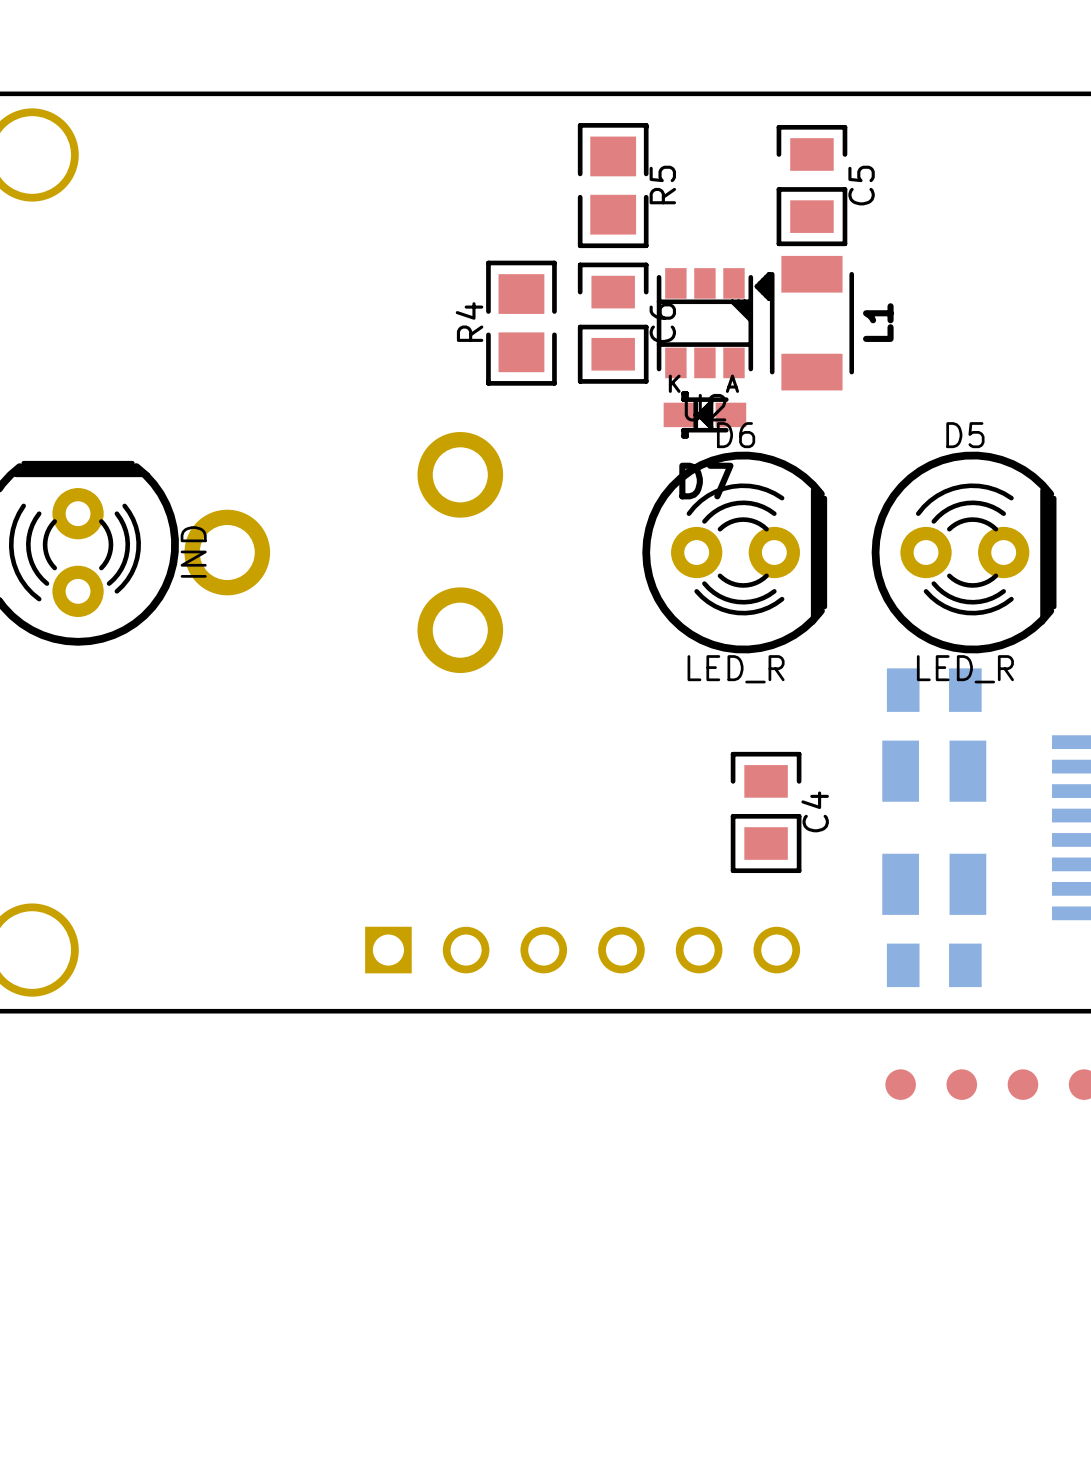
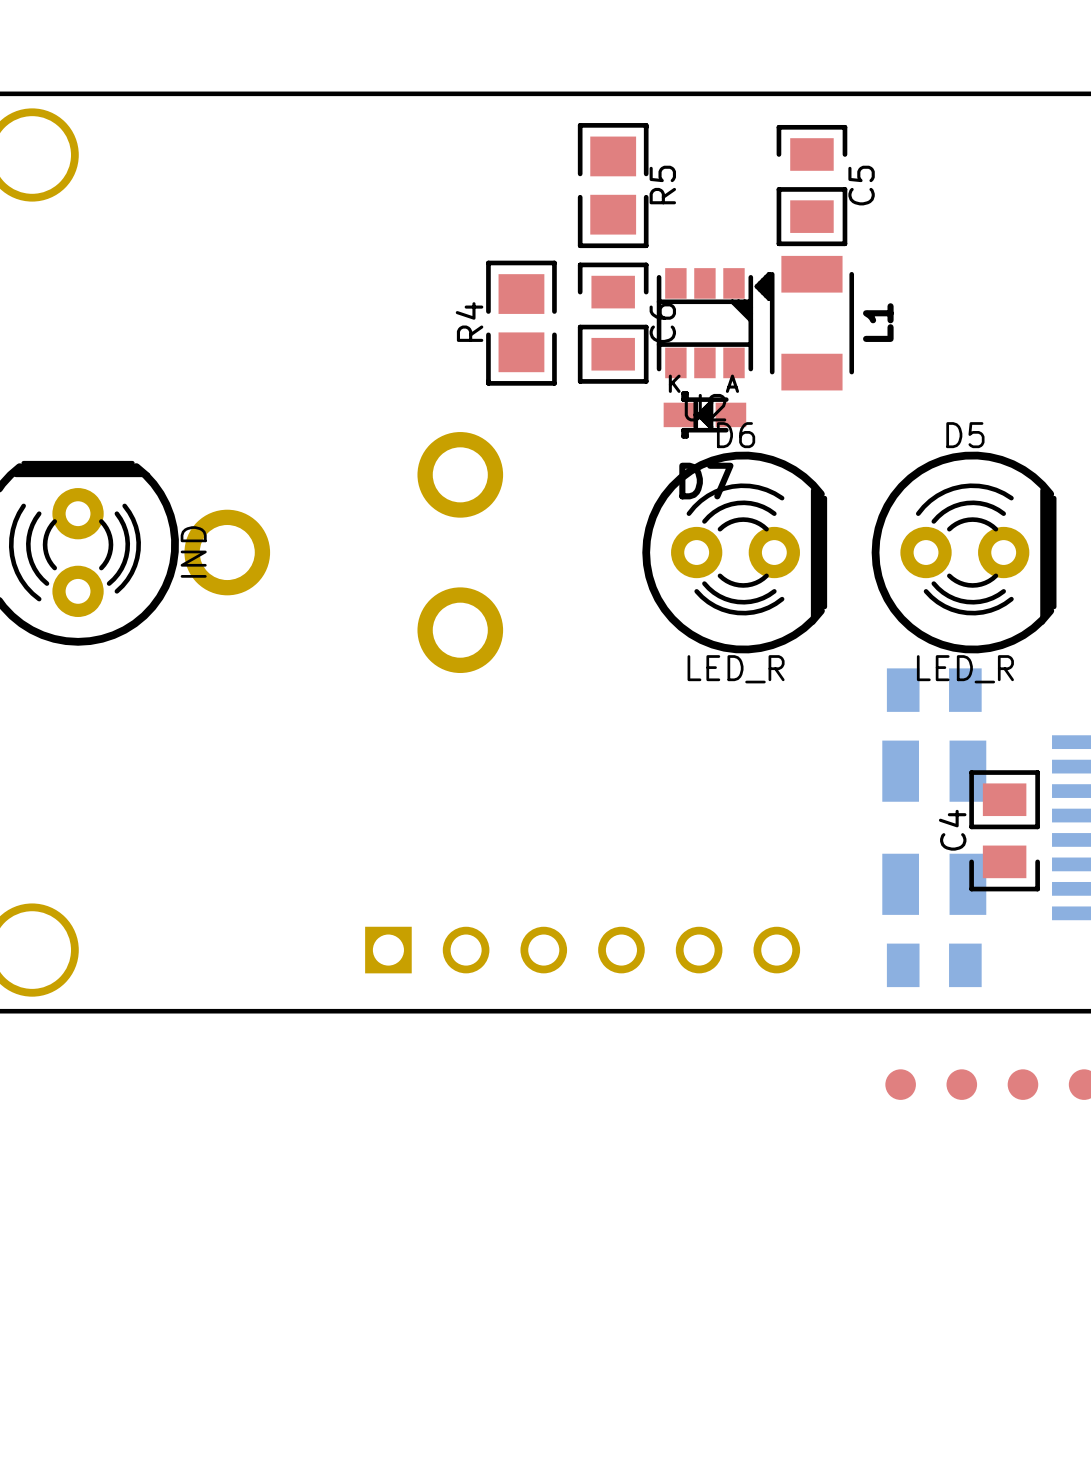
C4 rotation: 0° (766, 812) -> 180° (1004, 830)
C4 position: (766, 812) -> (1004, 830)

